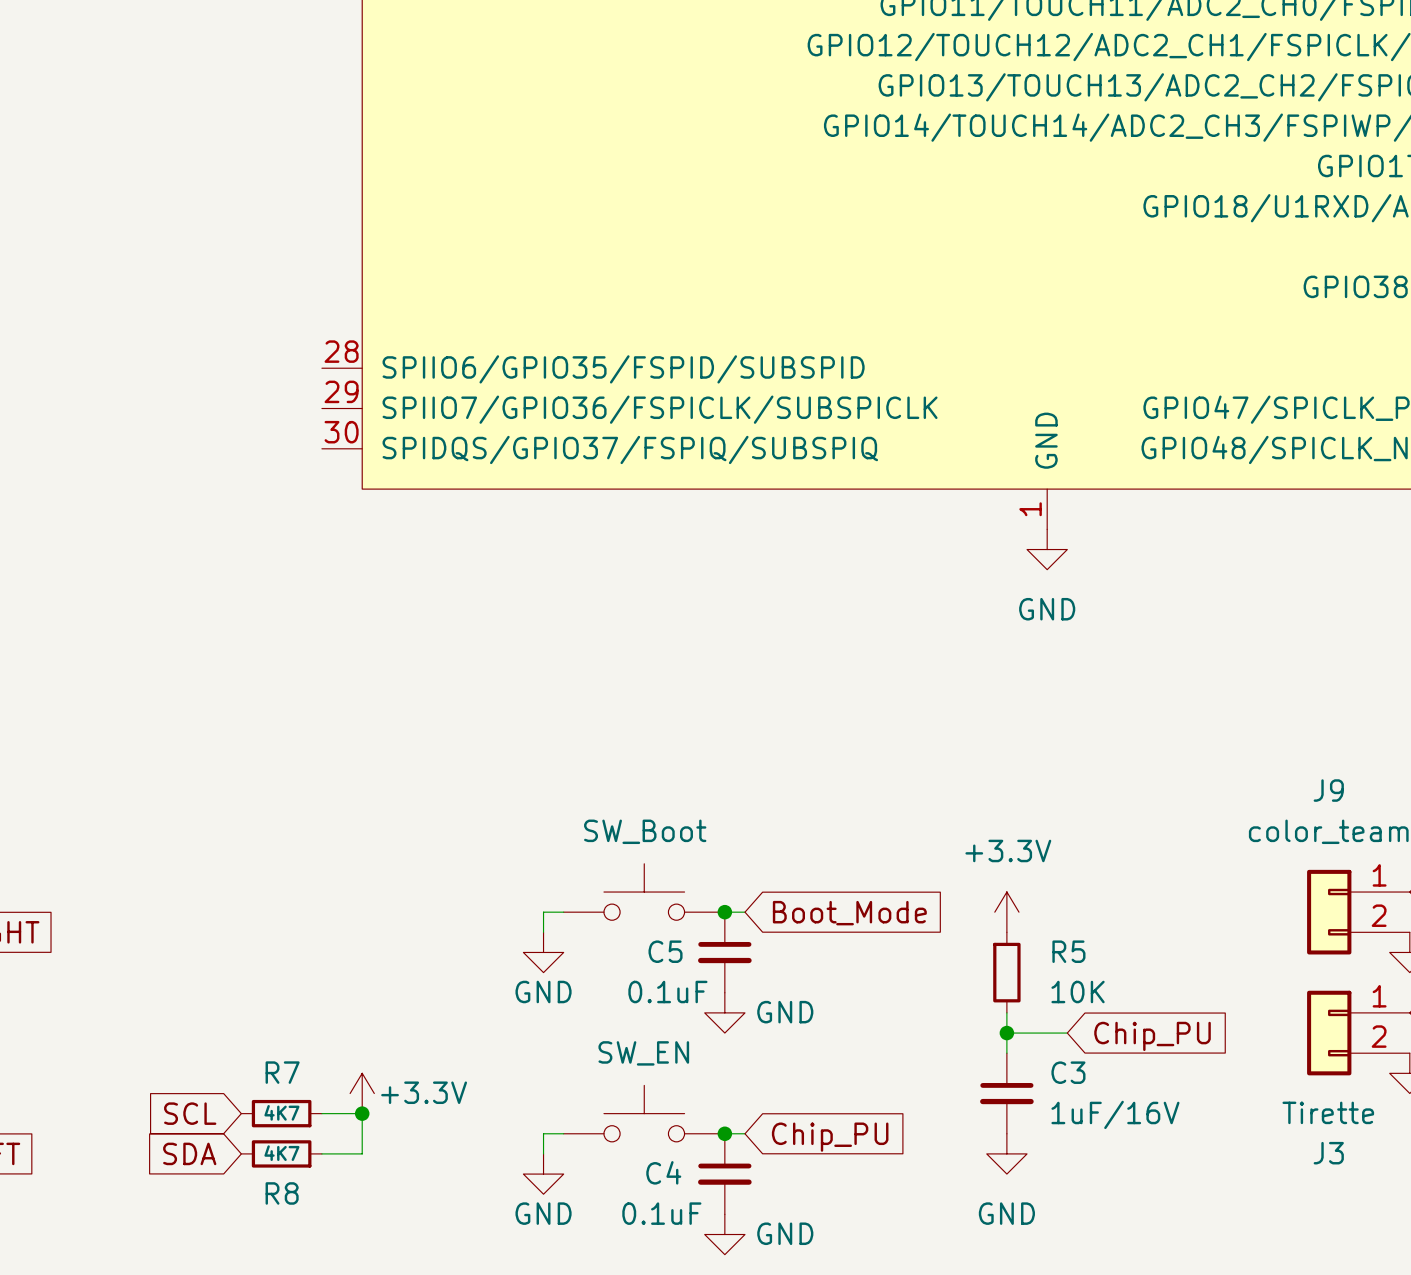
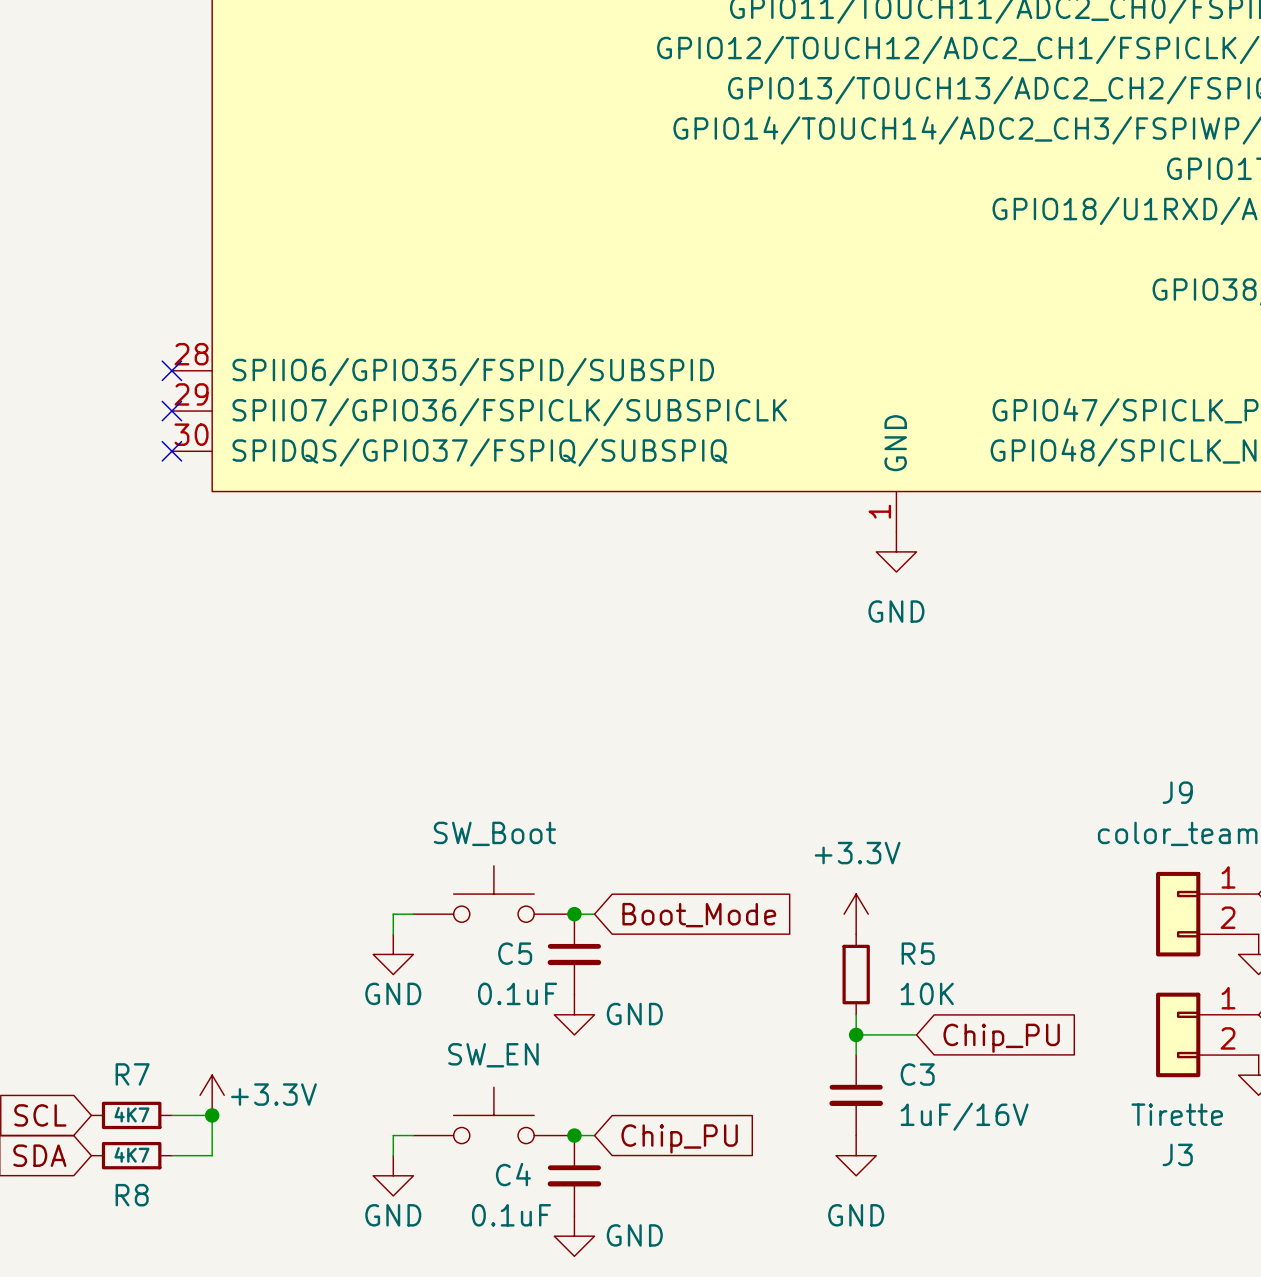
no-connect mark: none -> (171, 370)
no-connect mark: none -> (171, 411)
no-connect mark: none -> (171, 451)

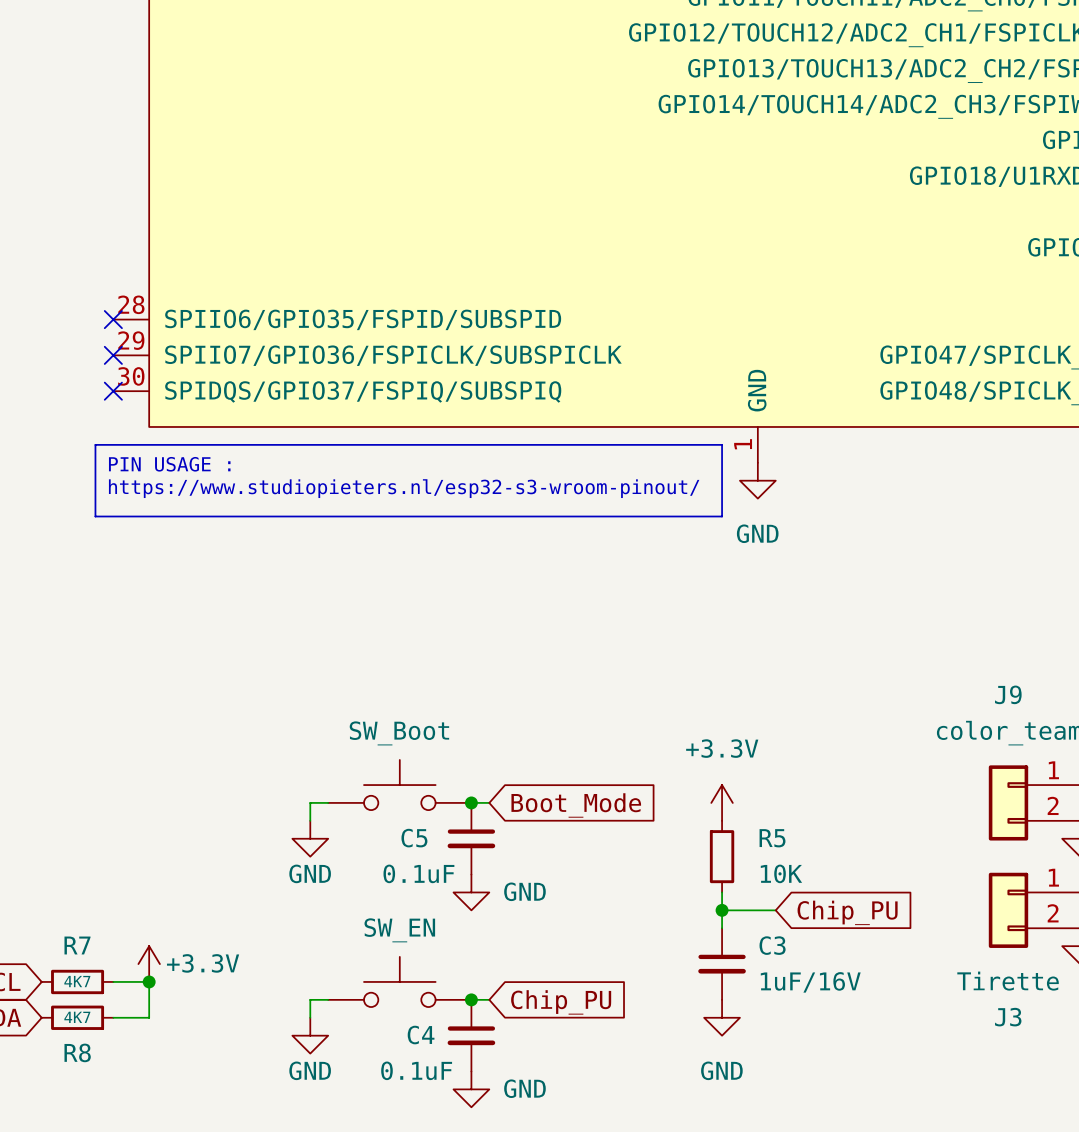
line: none -> (95, 444) (722, 444) (722, 516) (95, 516) (95, 444)
text: none -> PIN USAGE : (169, 464)
text: none -> https://www.studiopieters.nl/esp32-s3-wroom-pinout/ (404, 488)

